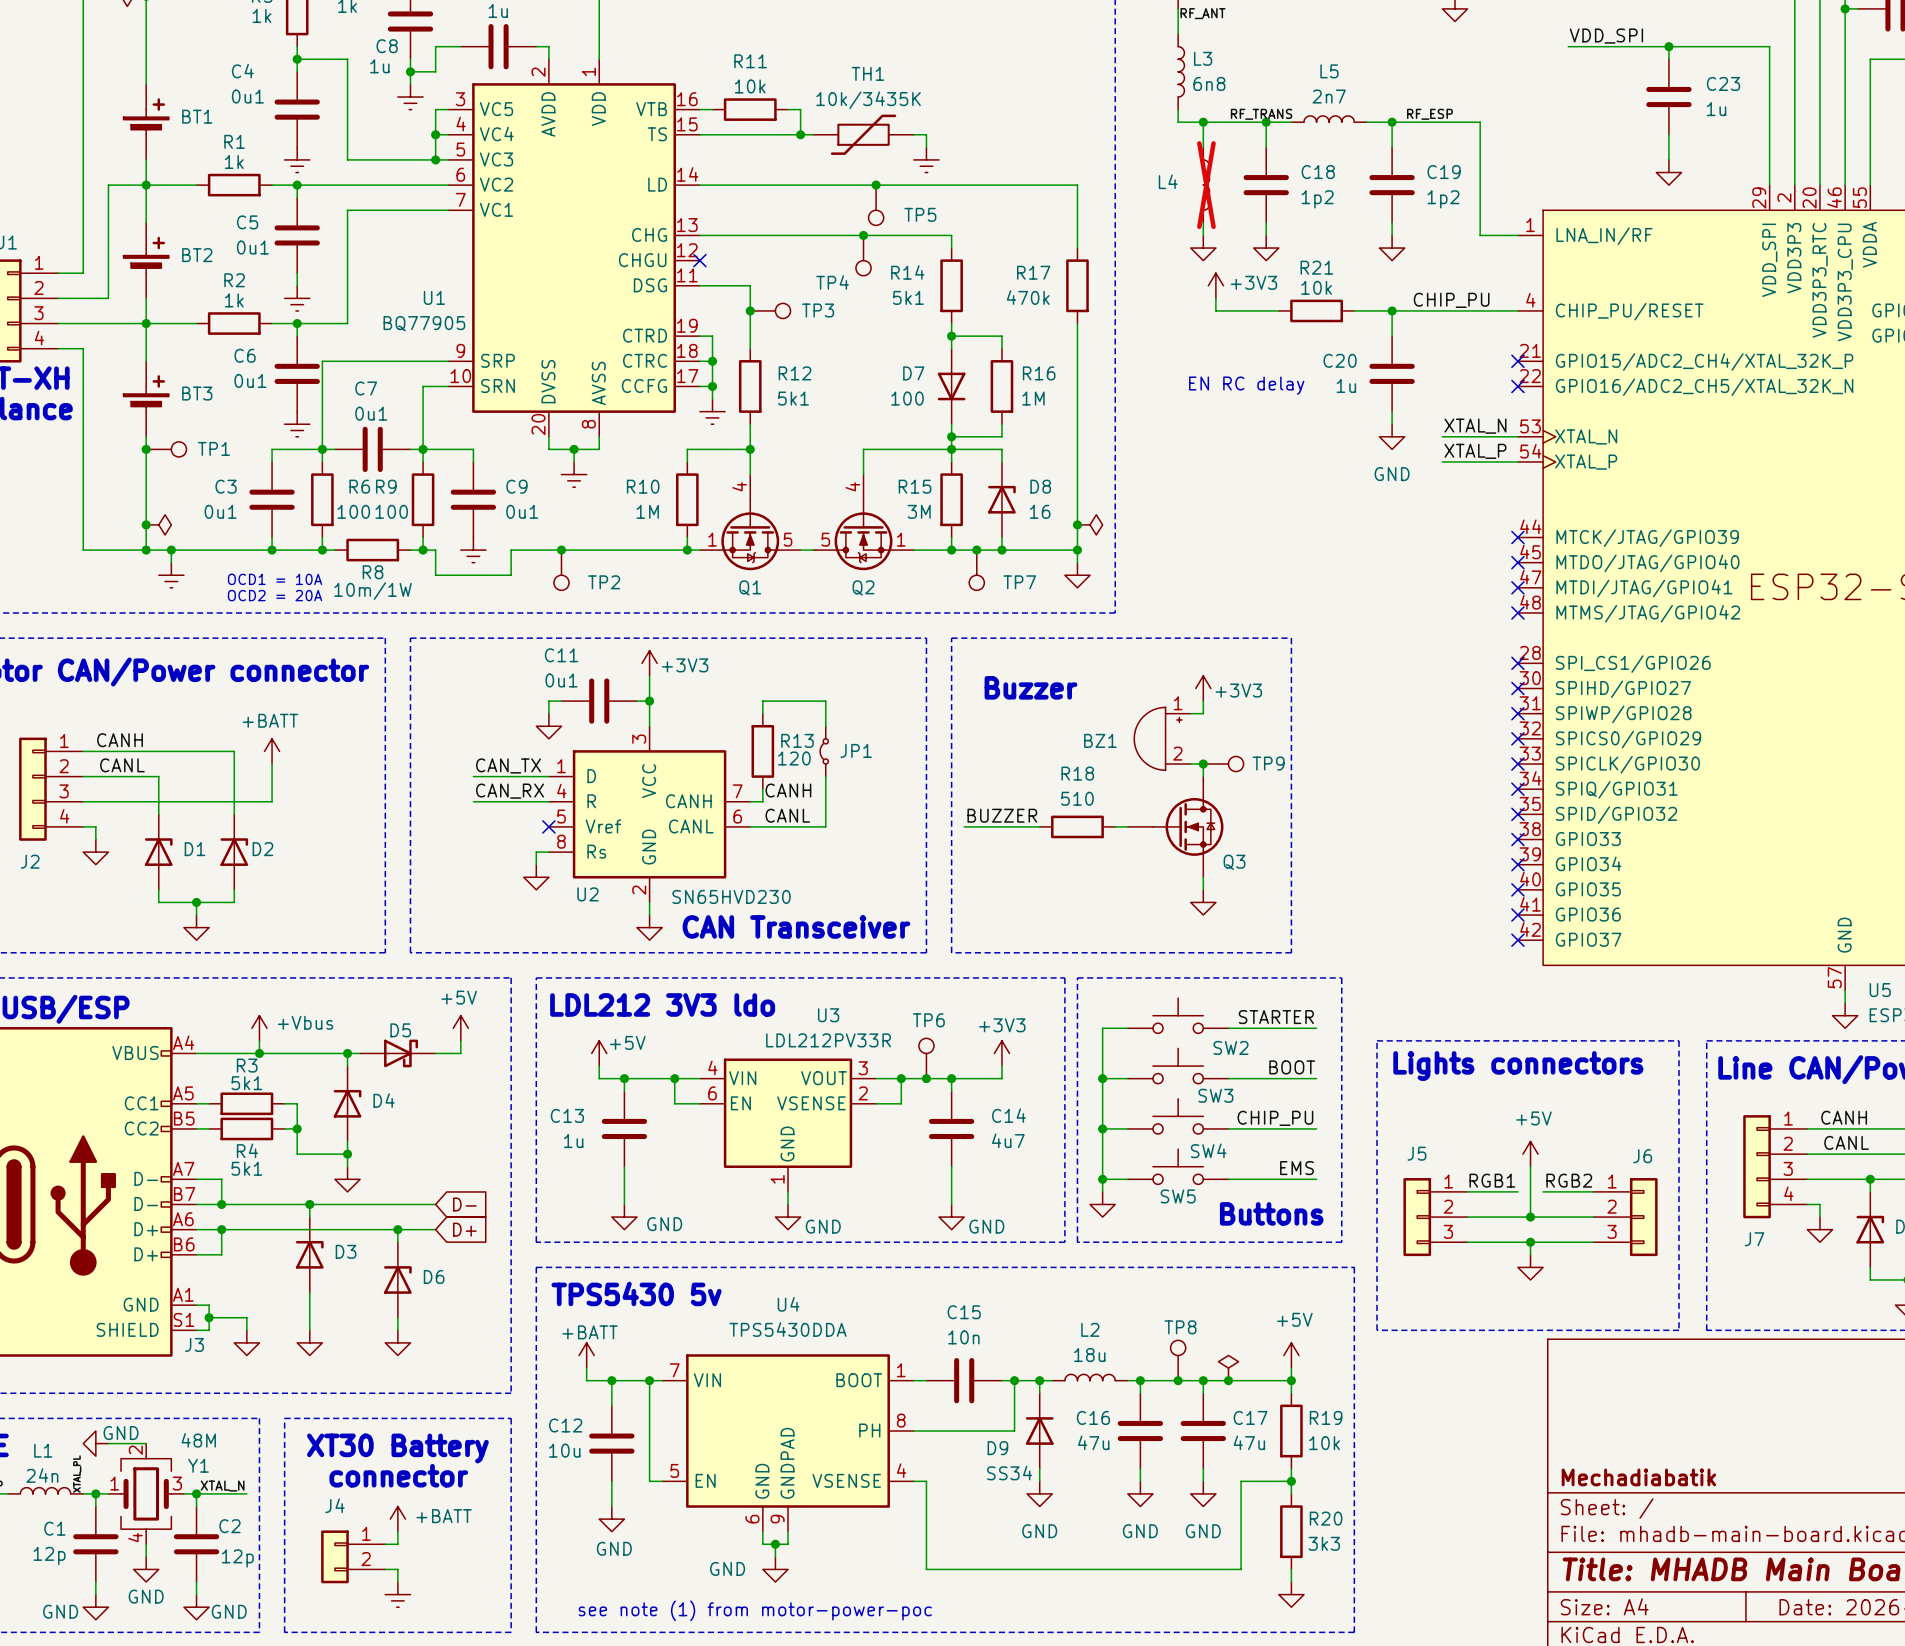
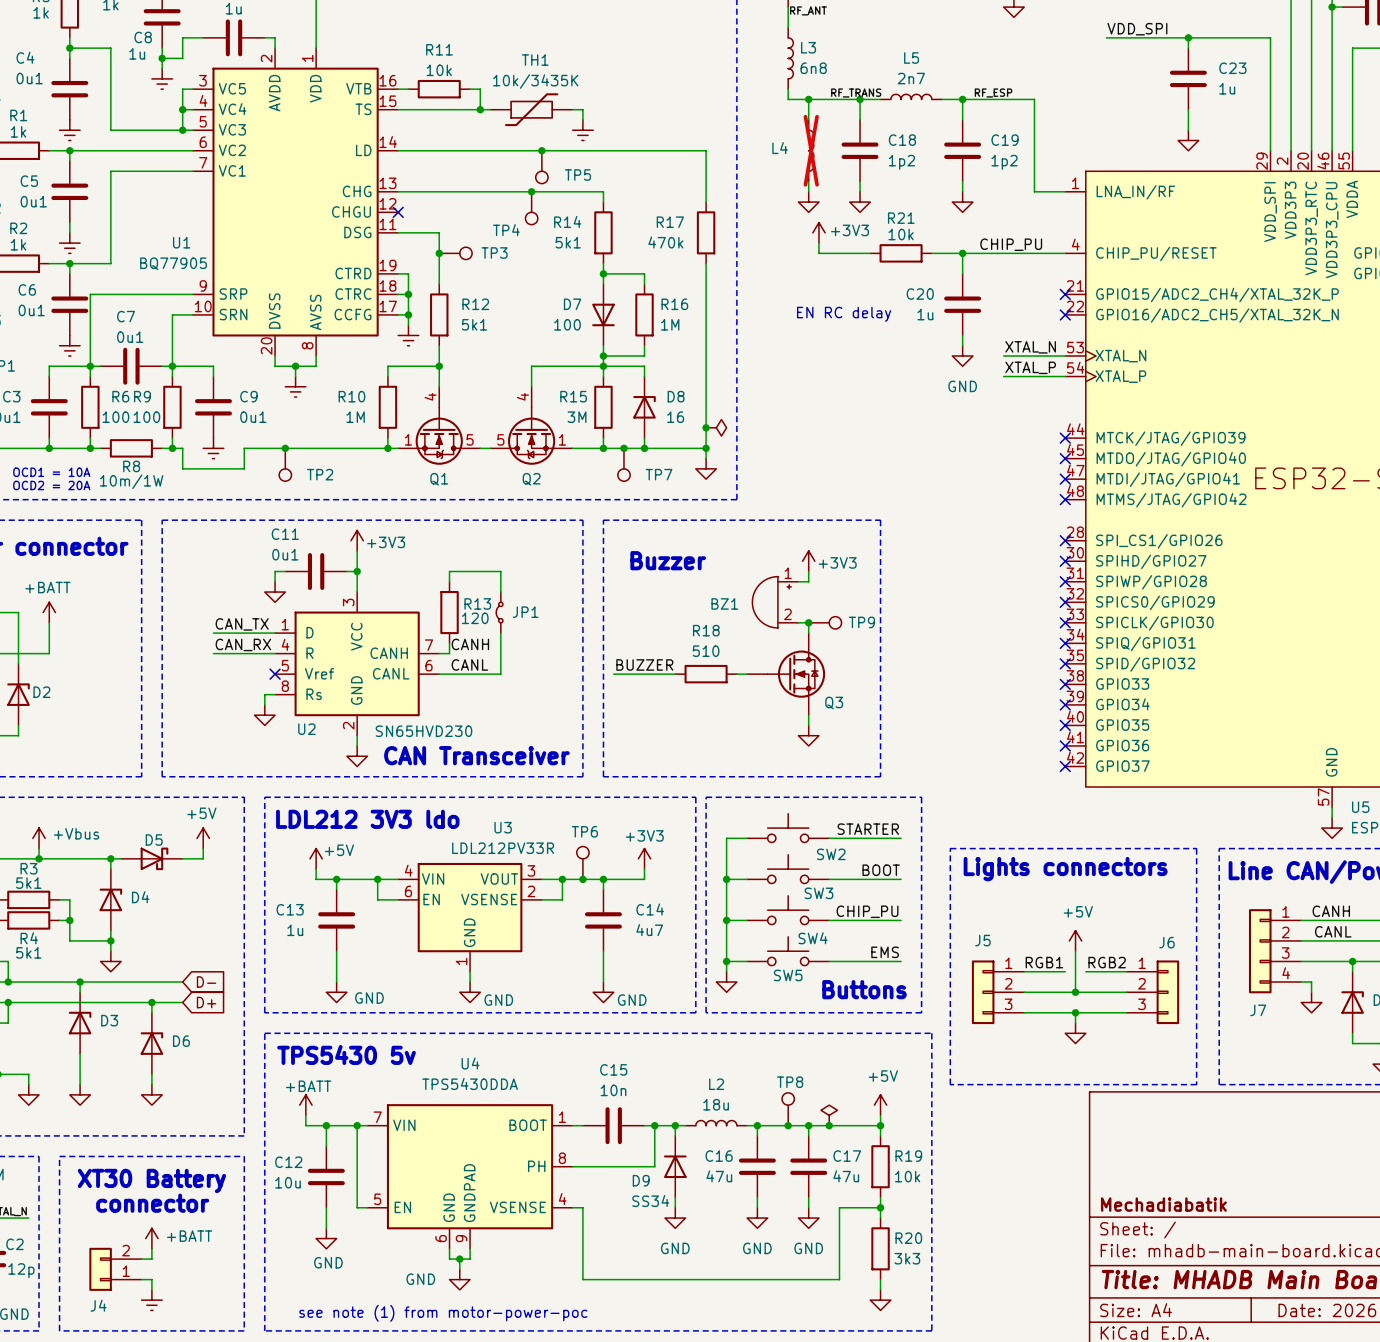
J4 flip: as is (334, 1556) -> up-down (100, 1269)

